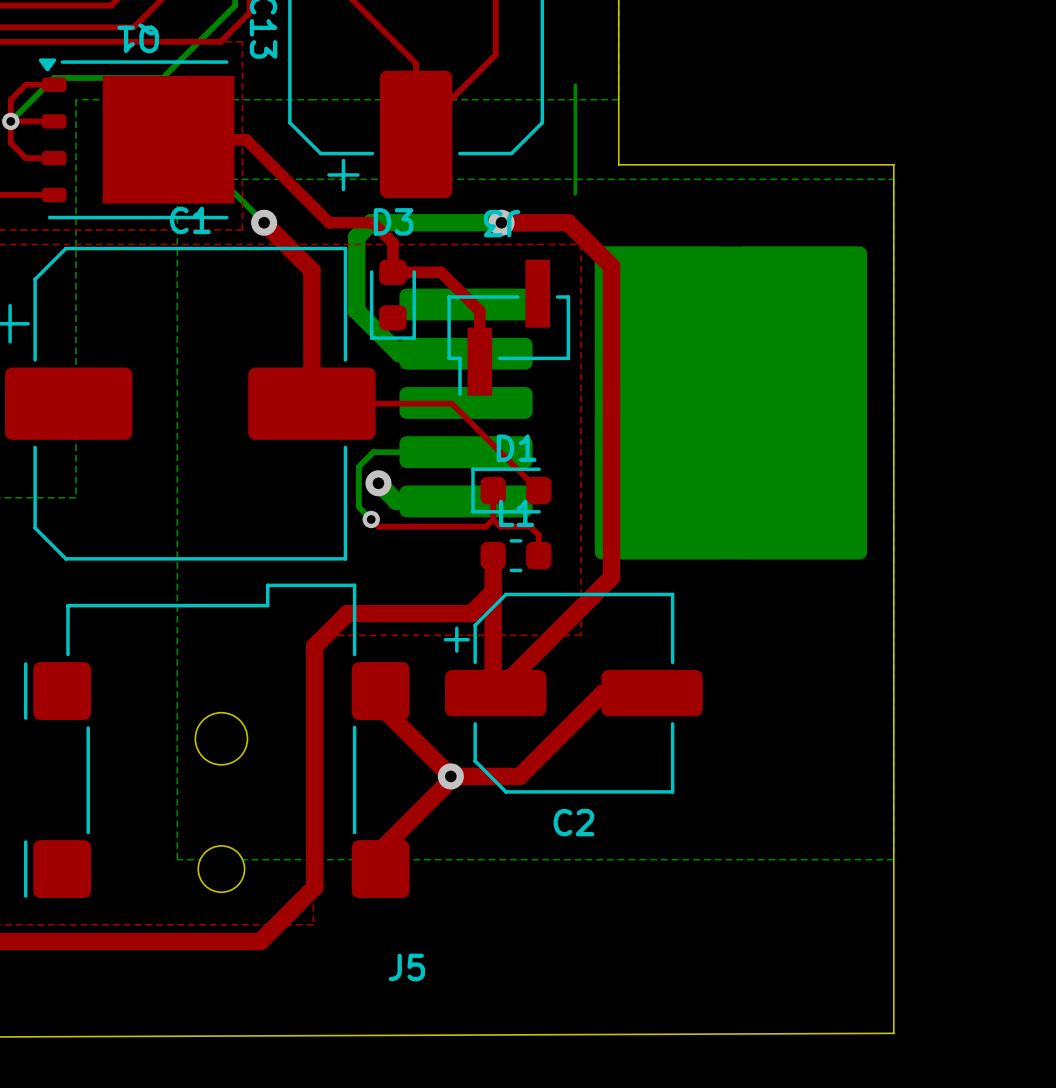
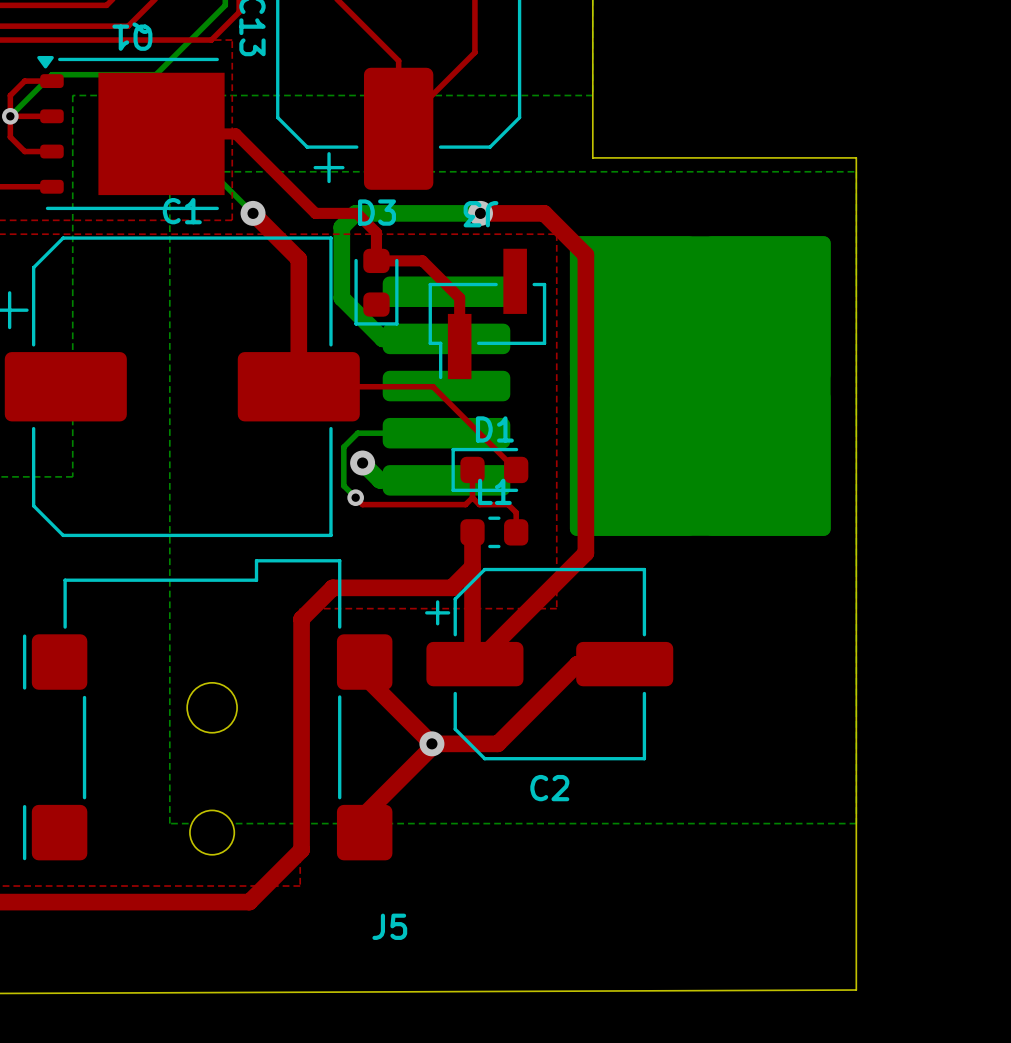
bottom track: (575, 85) (575, 193) -> none

